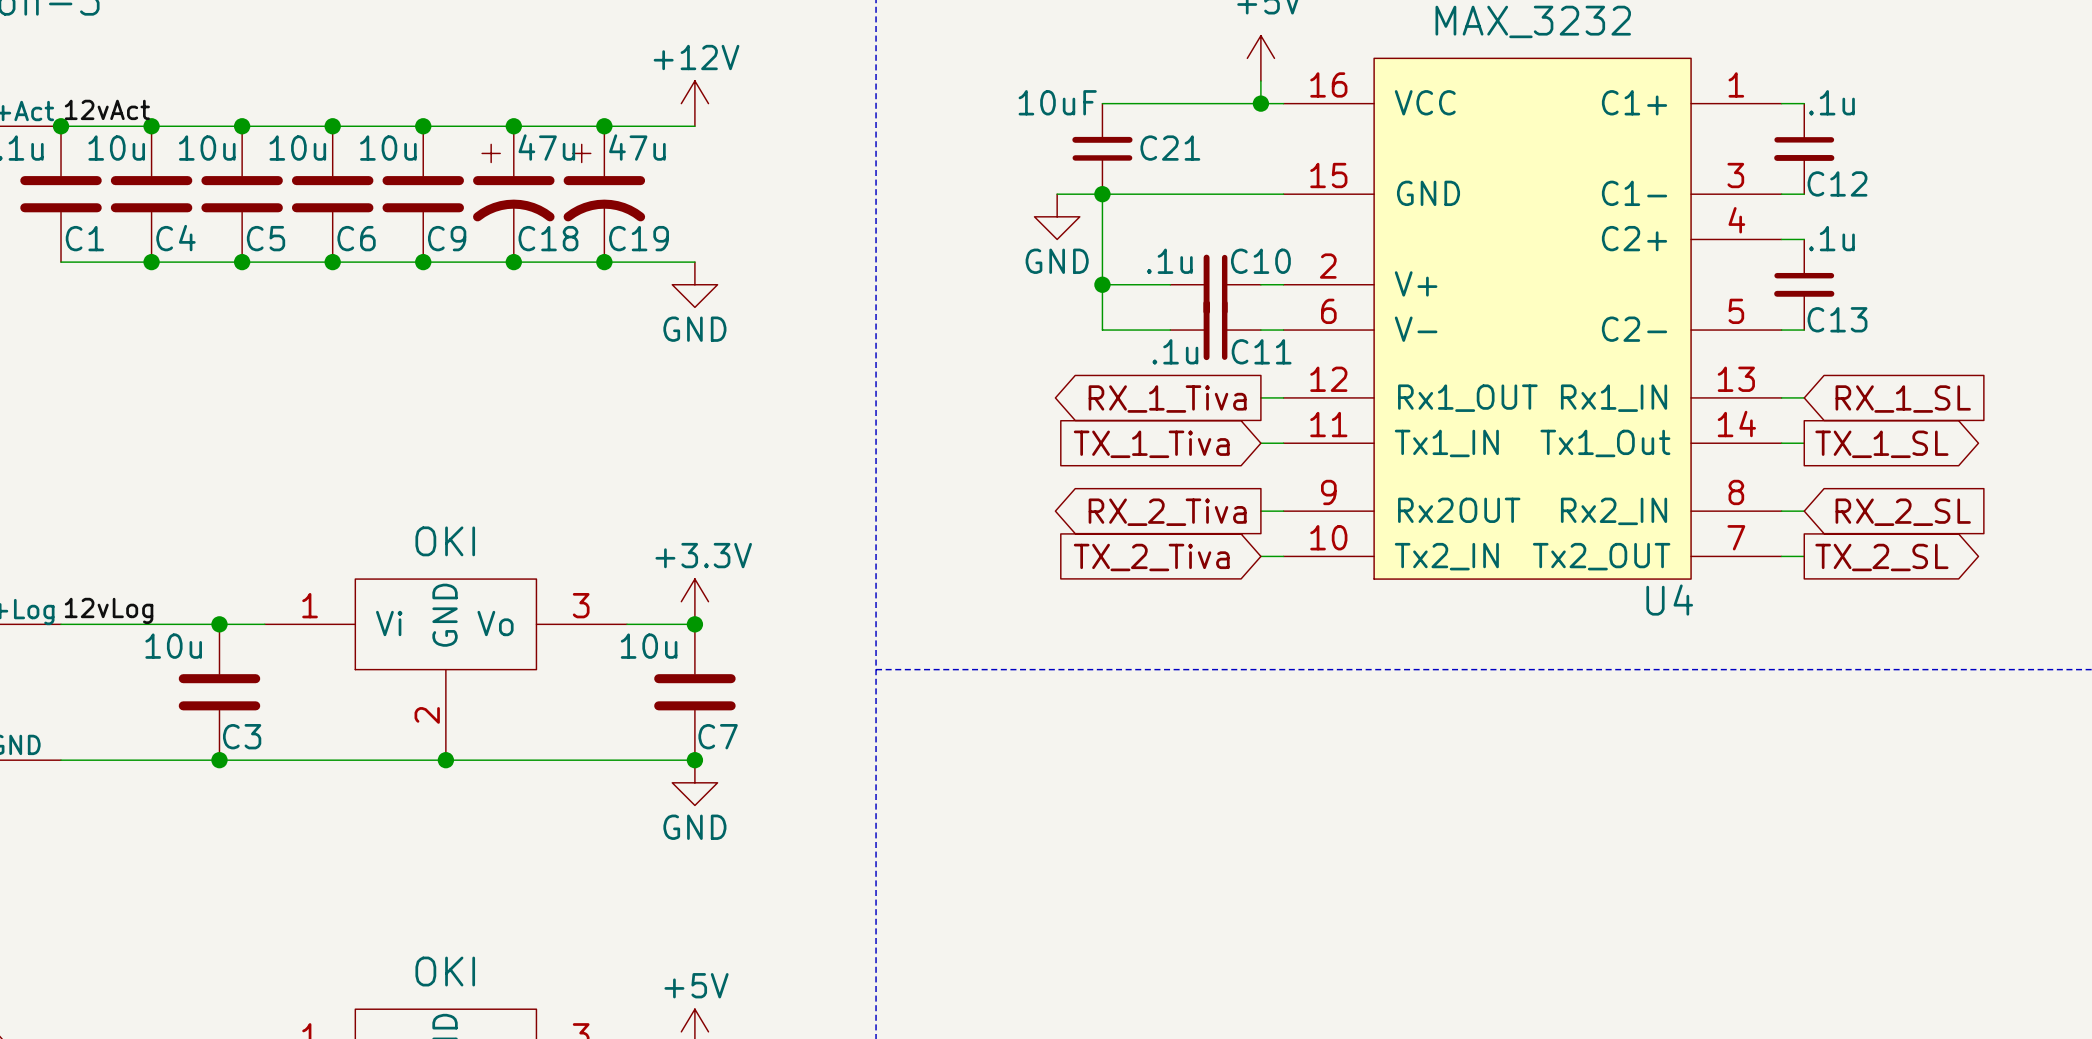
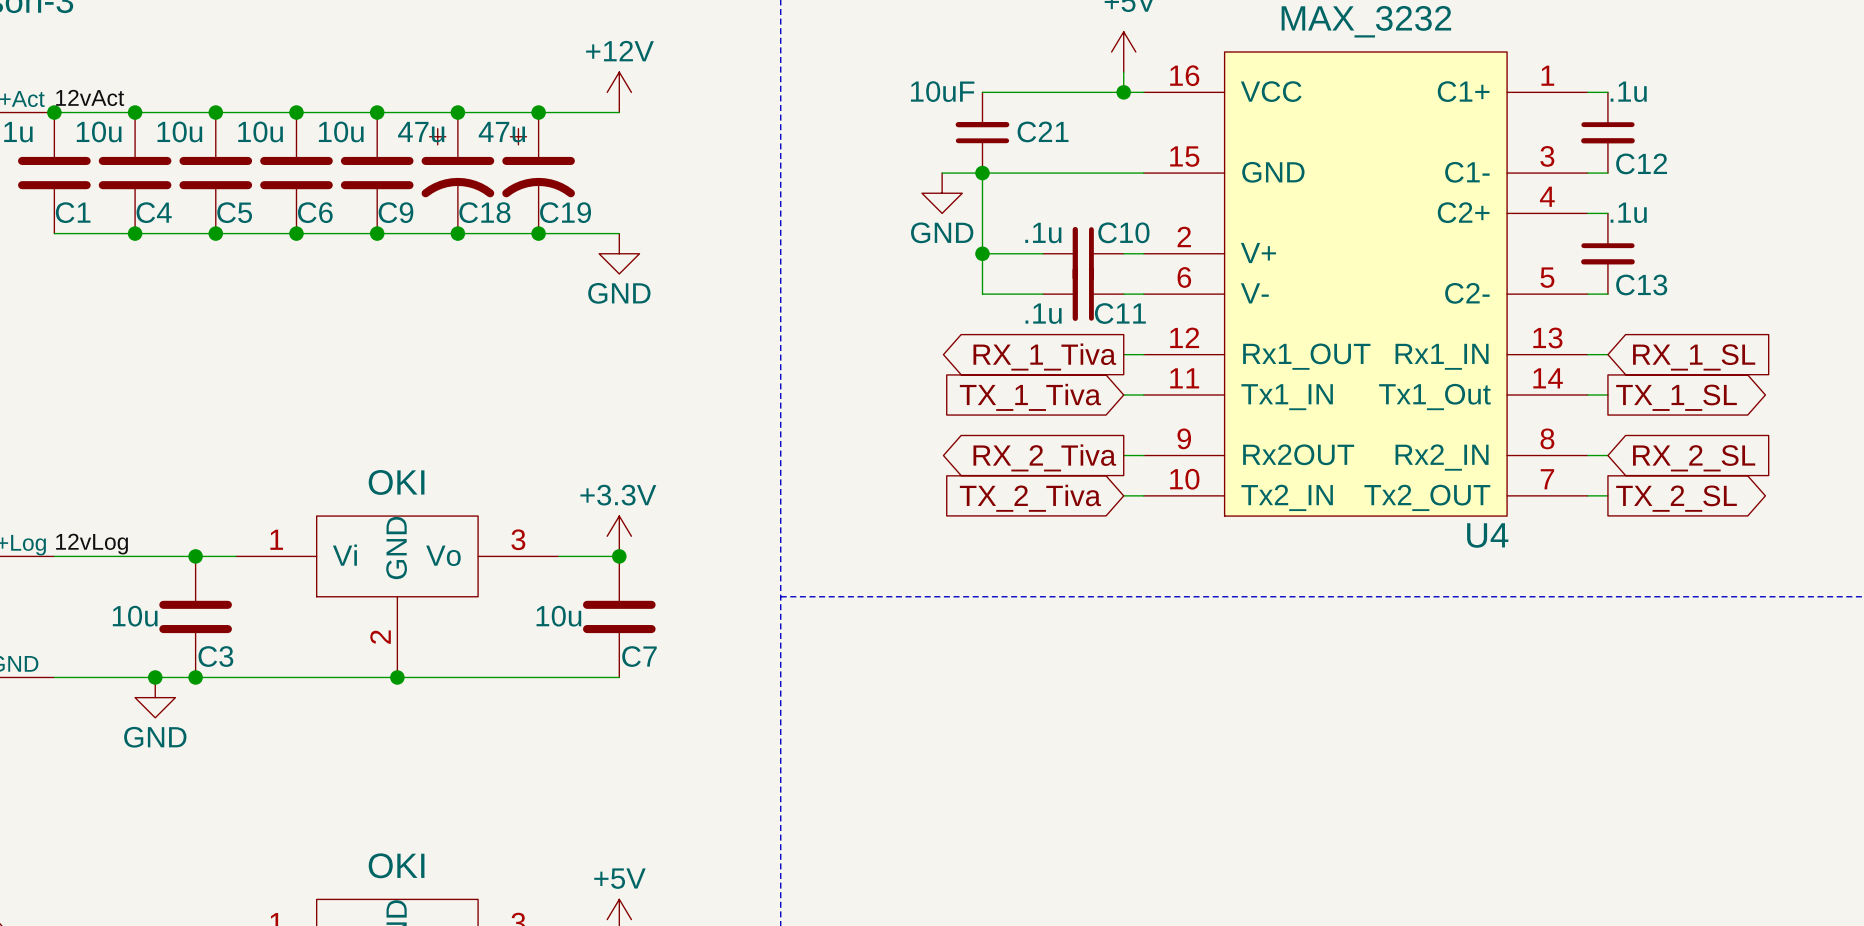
C18 value position: 47u (546, 147) -> 47u (421, 132)
C19 value position: 47u (637, 147) -> 47u (501, 132)
C3 value position: 10u (173, 646) -> 10u (135, 616)
C7 value position: 10u (649, 646) -> 10u (558, 616)
junction: none -> (155, 677)
junction: (694, 760) -> none
power symbol: none -> GND (155, 697)
power symbol: GND (694, 782) -> none

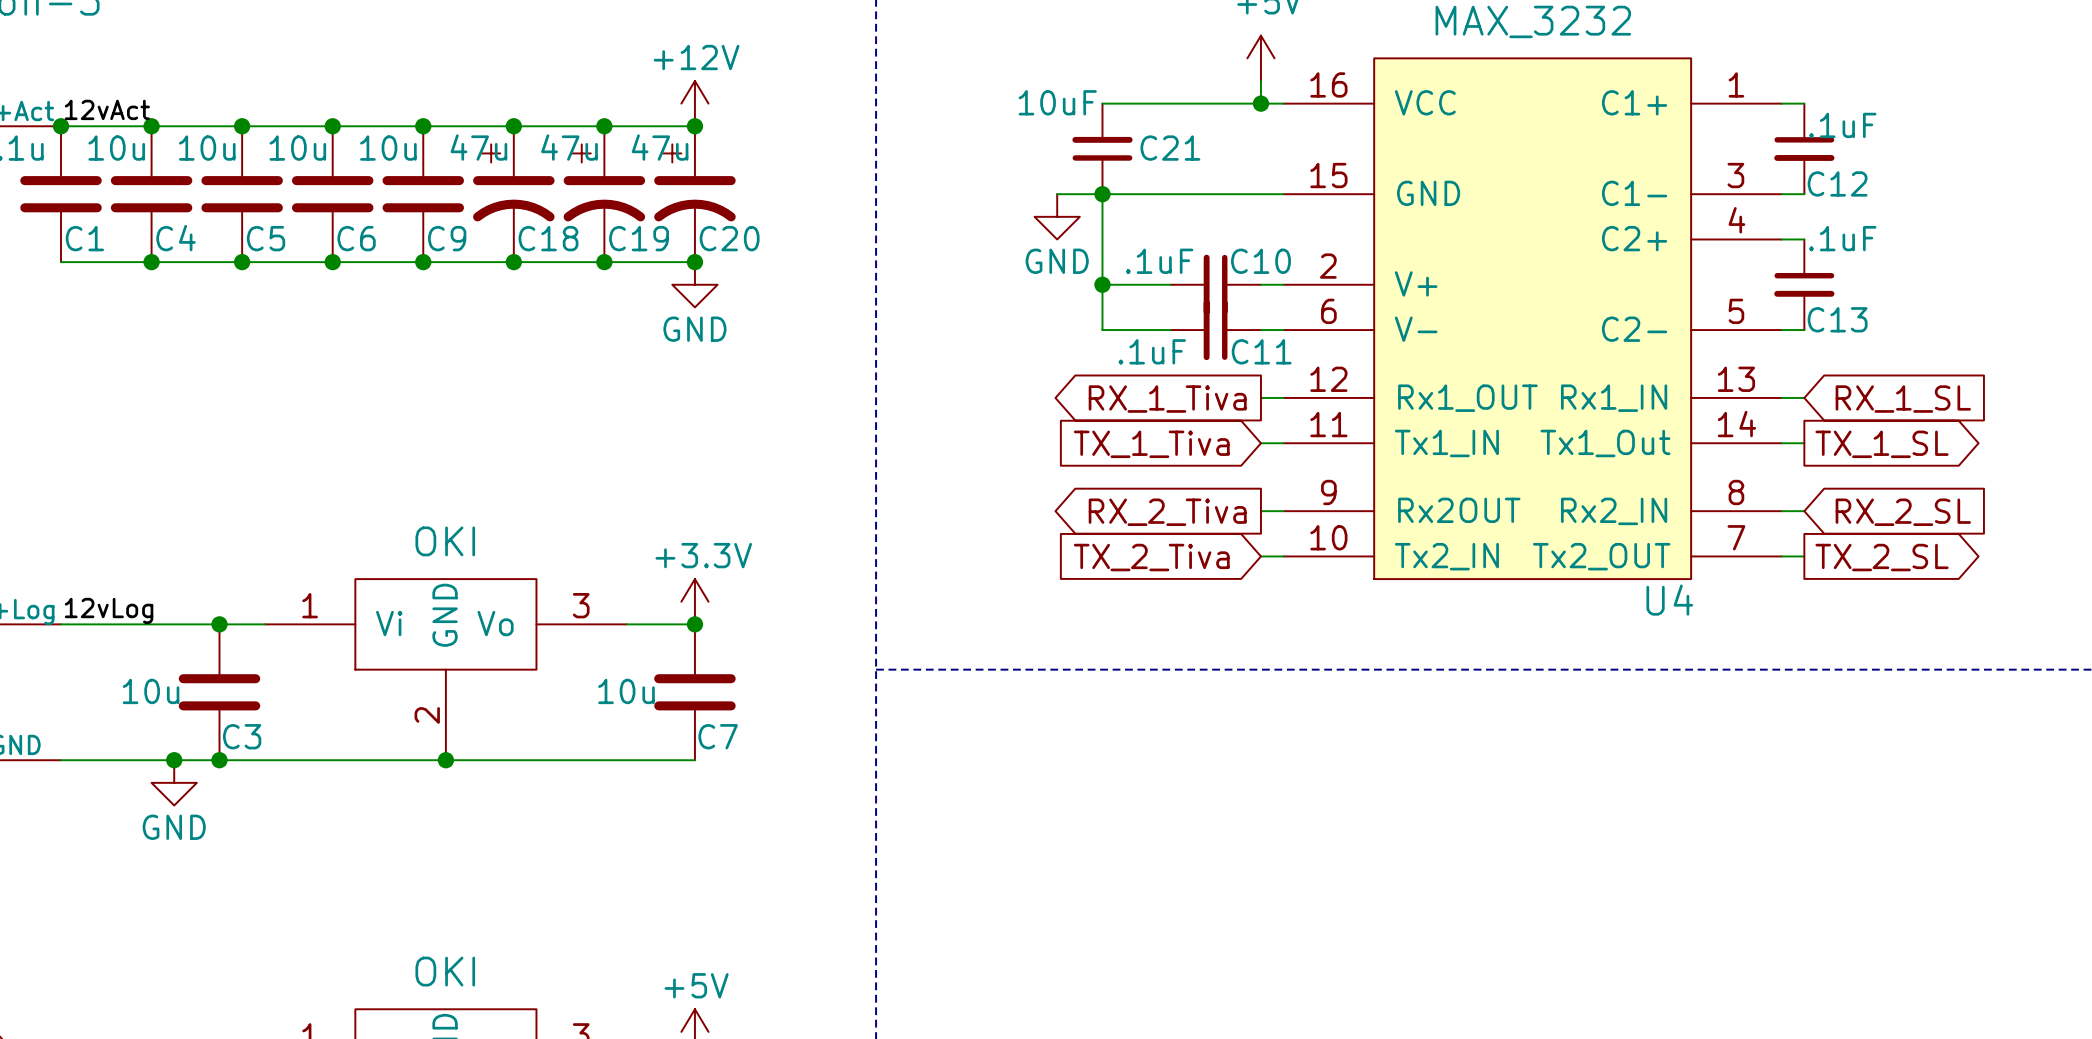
C12 value: .1u (1628, 91) -> .1uF (1842, 125)
junction: none -> (694, 126)
C20: none -> 47u (694, 194)
C13 value: .1u (1628, 212) -> .1uF (1842, 238)
C10 value: .1u (1043, 232) -> .1uF (1159, 261)
junction: none -> (694, 262)
C11 value: .1u (1043, 313) -> .1uF (1152, 351)

